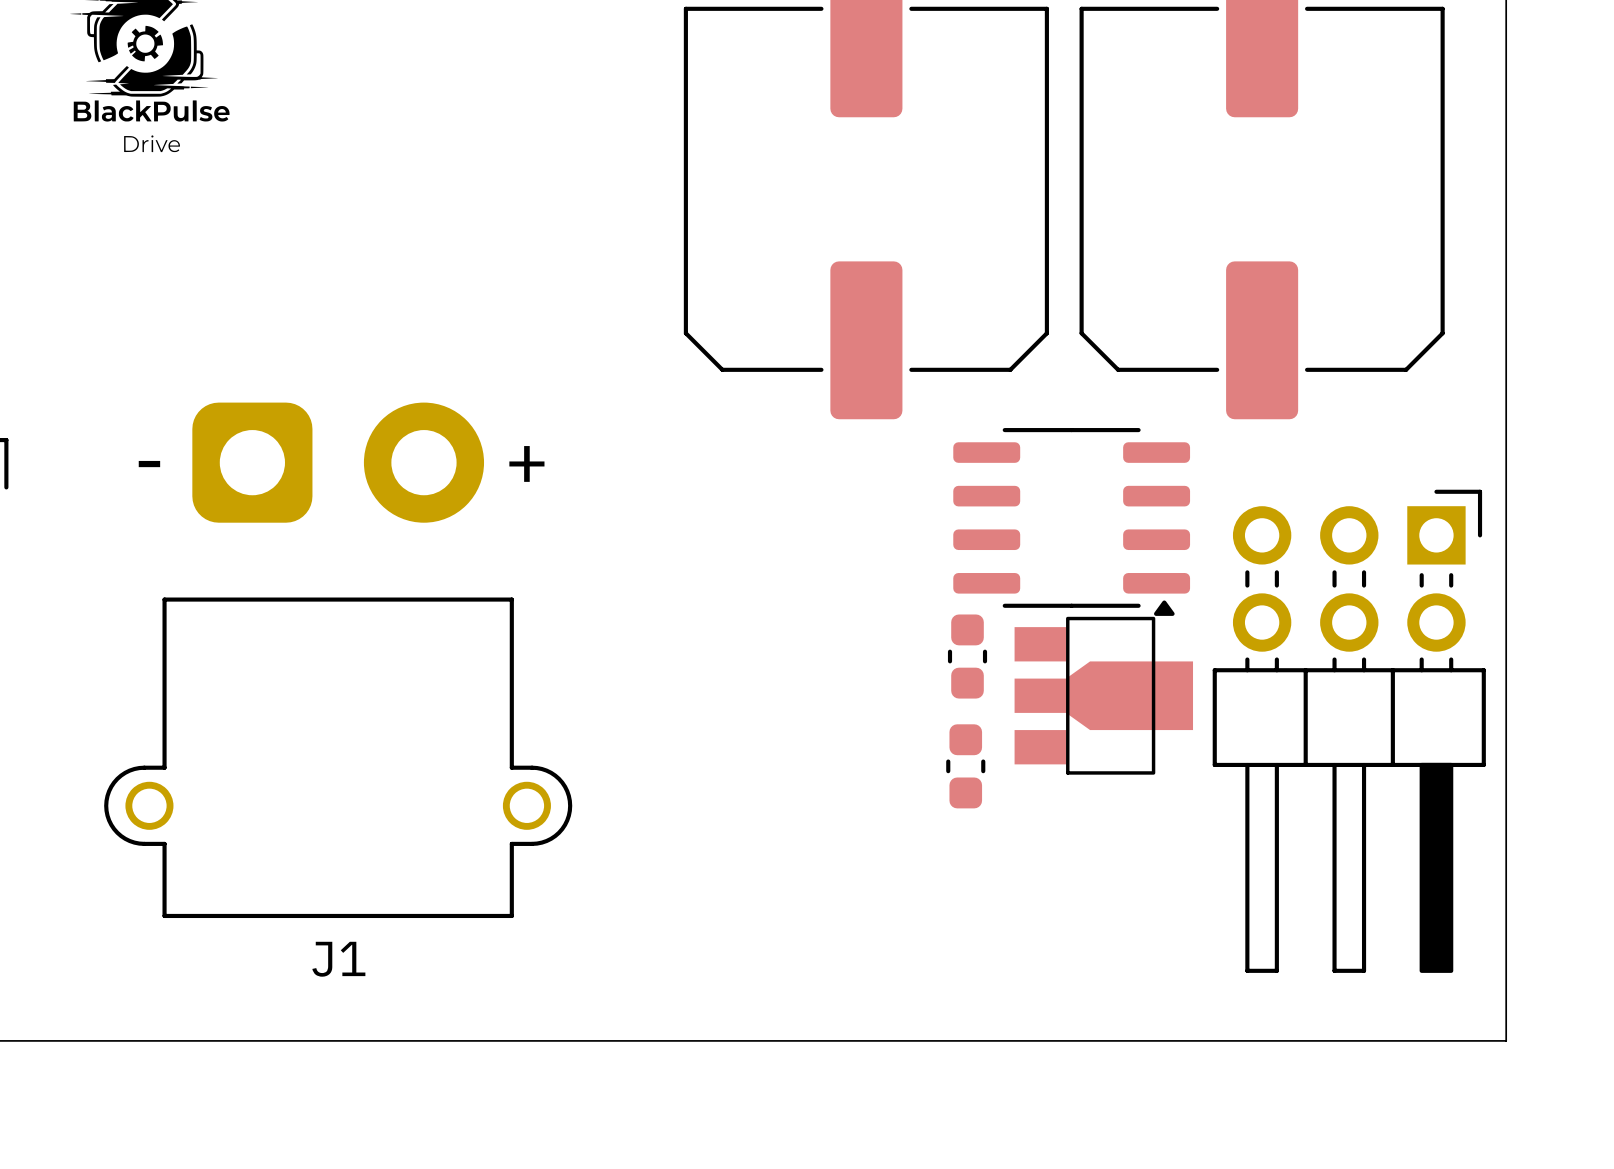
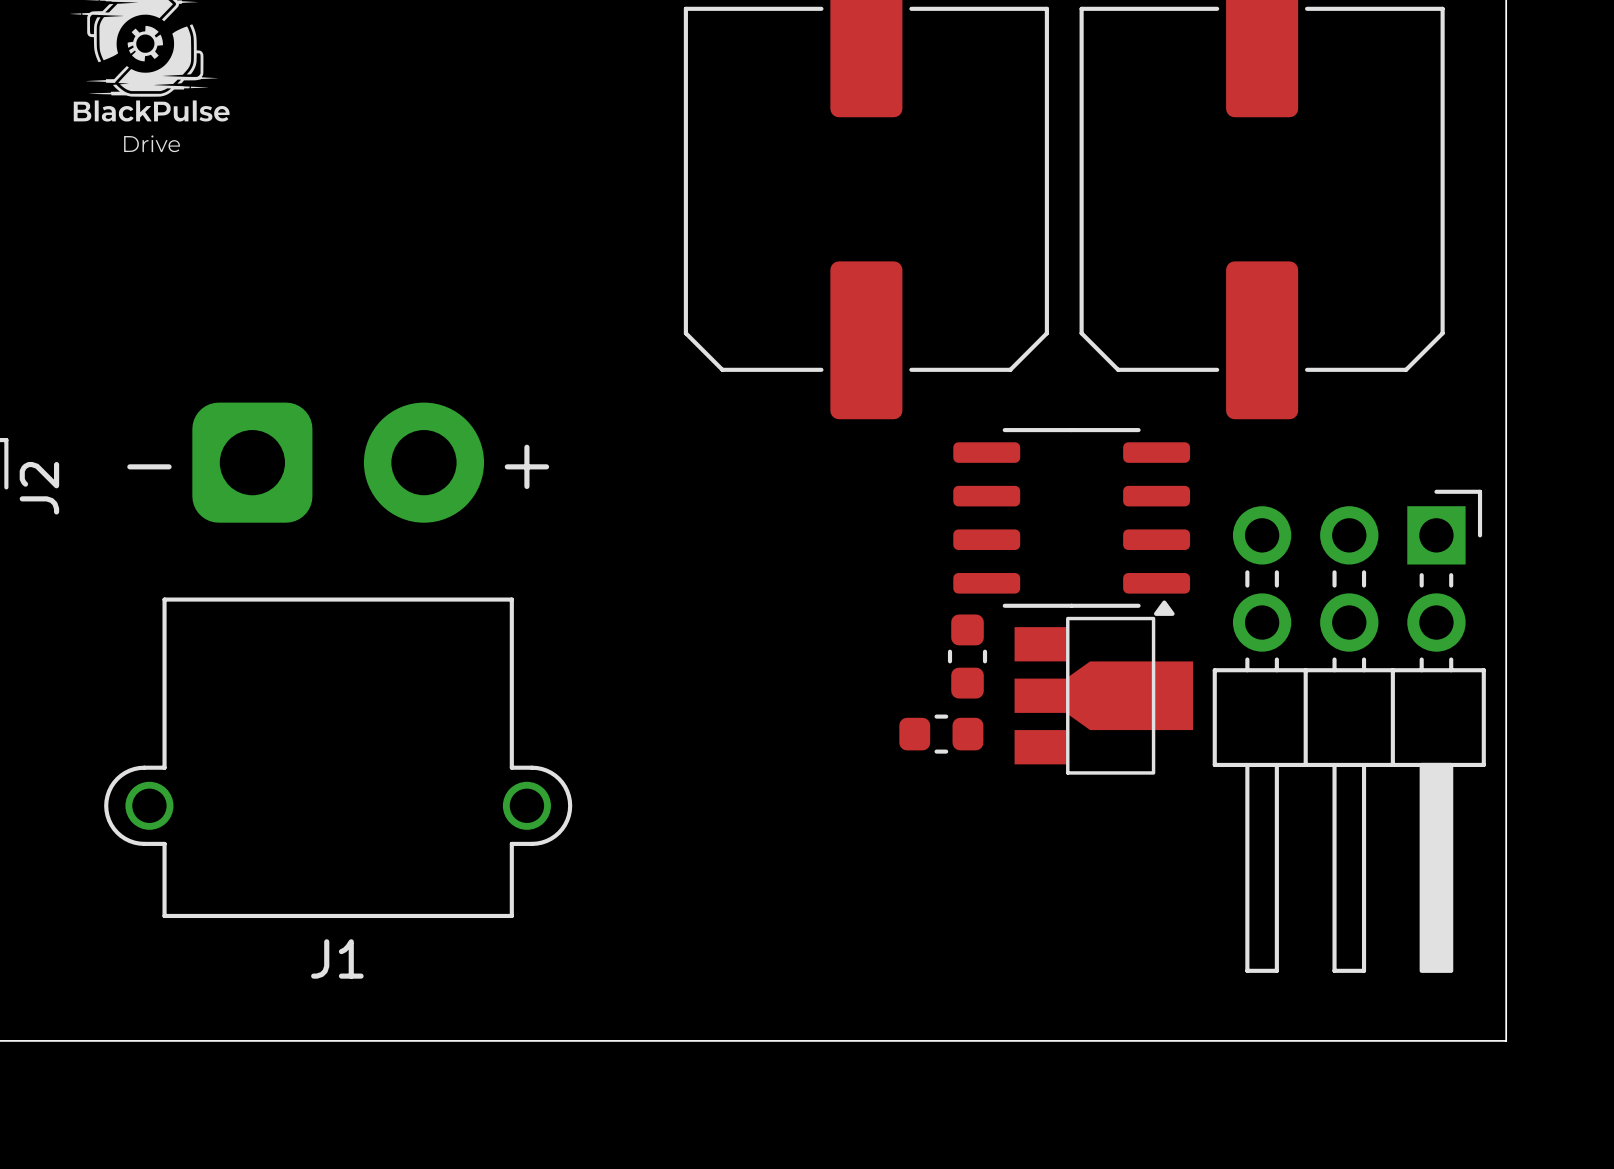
J2 name: none -> J2 (39, 488)
part rotation: 0° (965, 766) -> 90° clockwise (941, 734)

